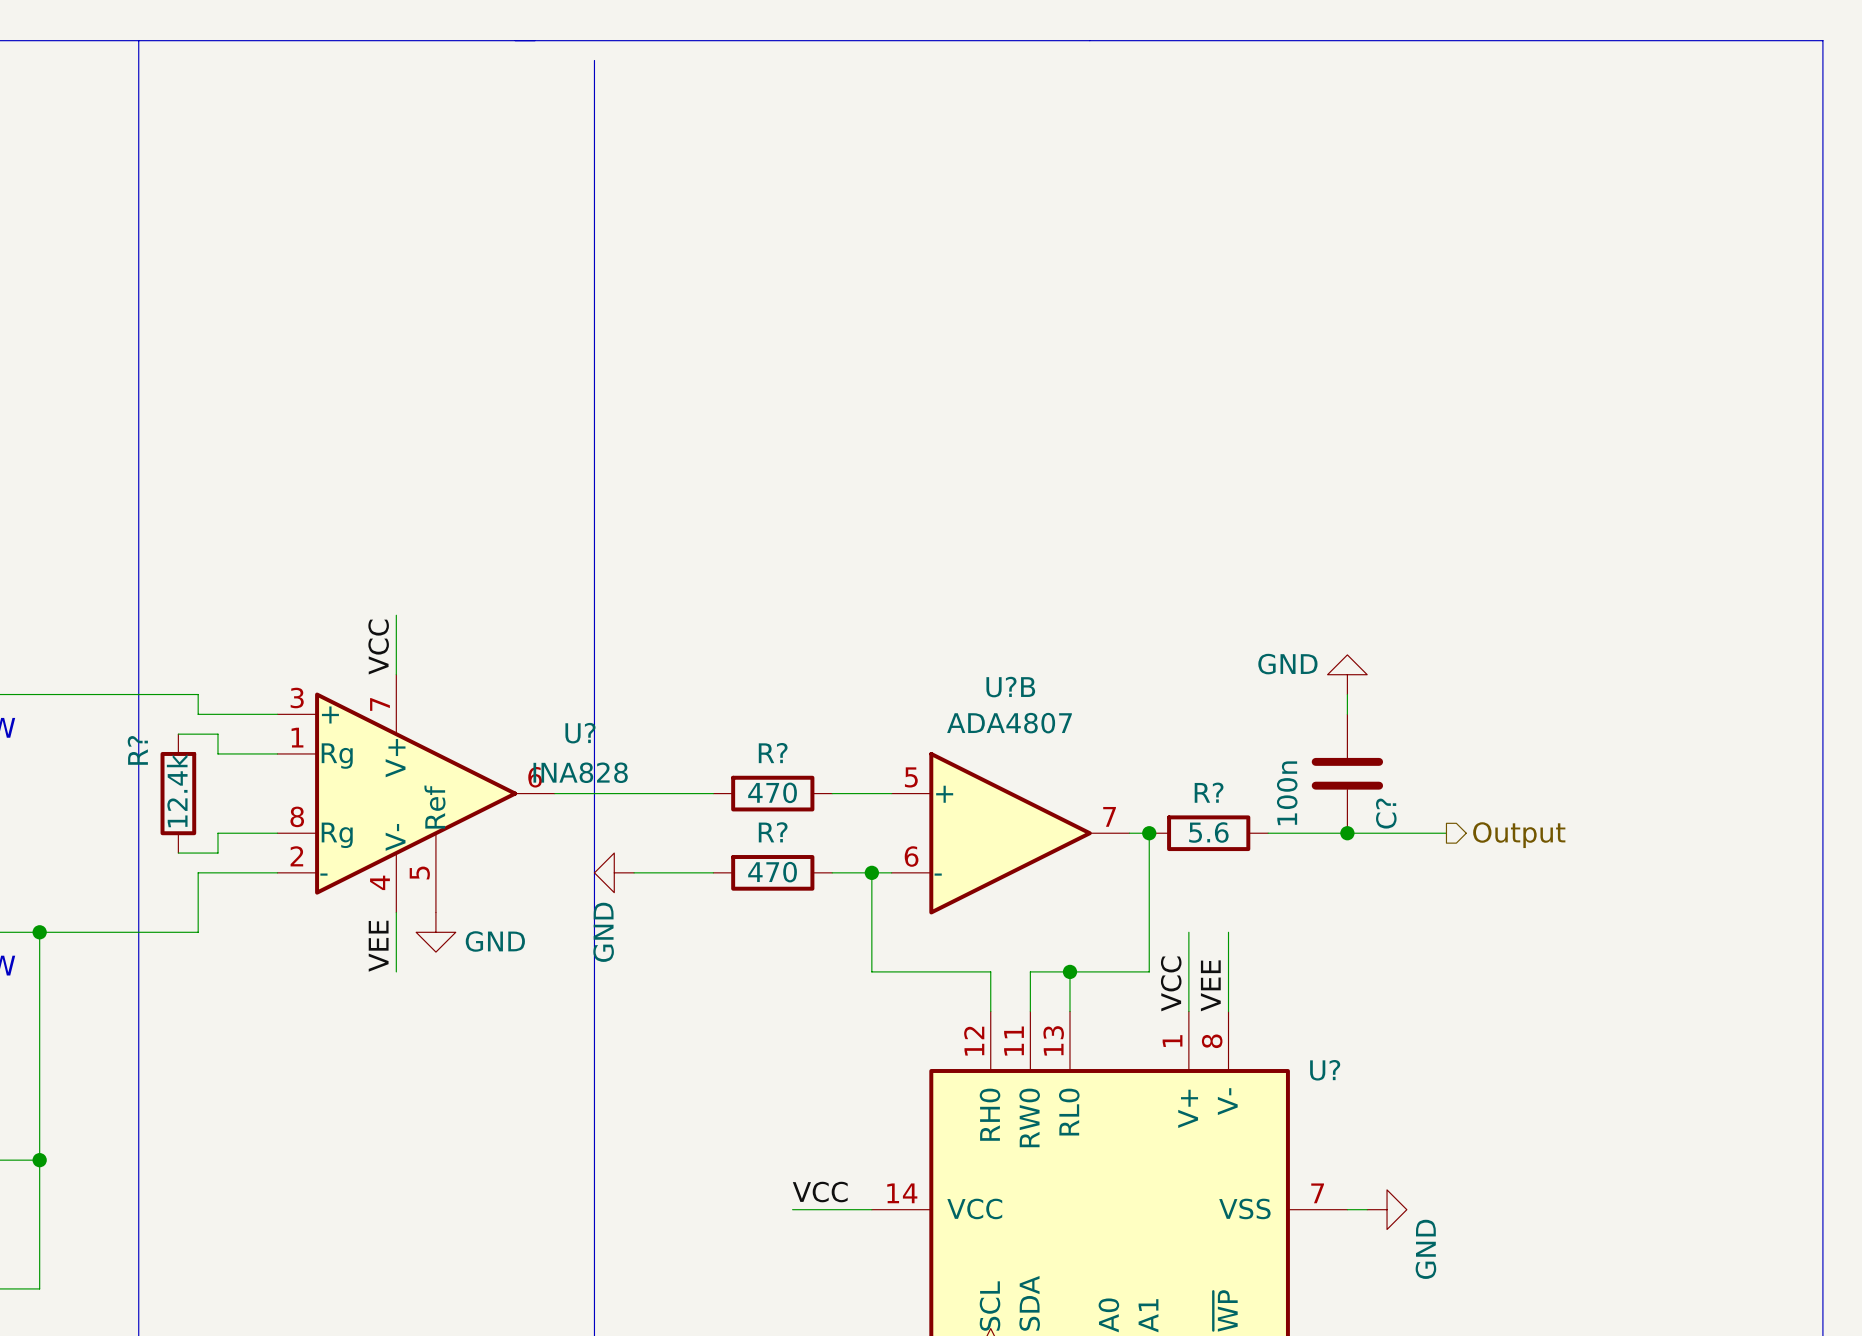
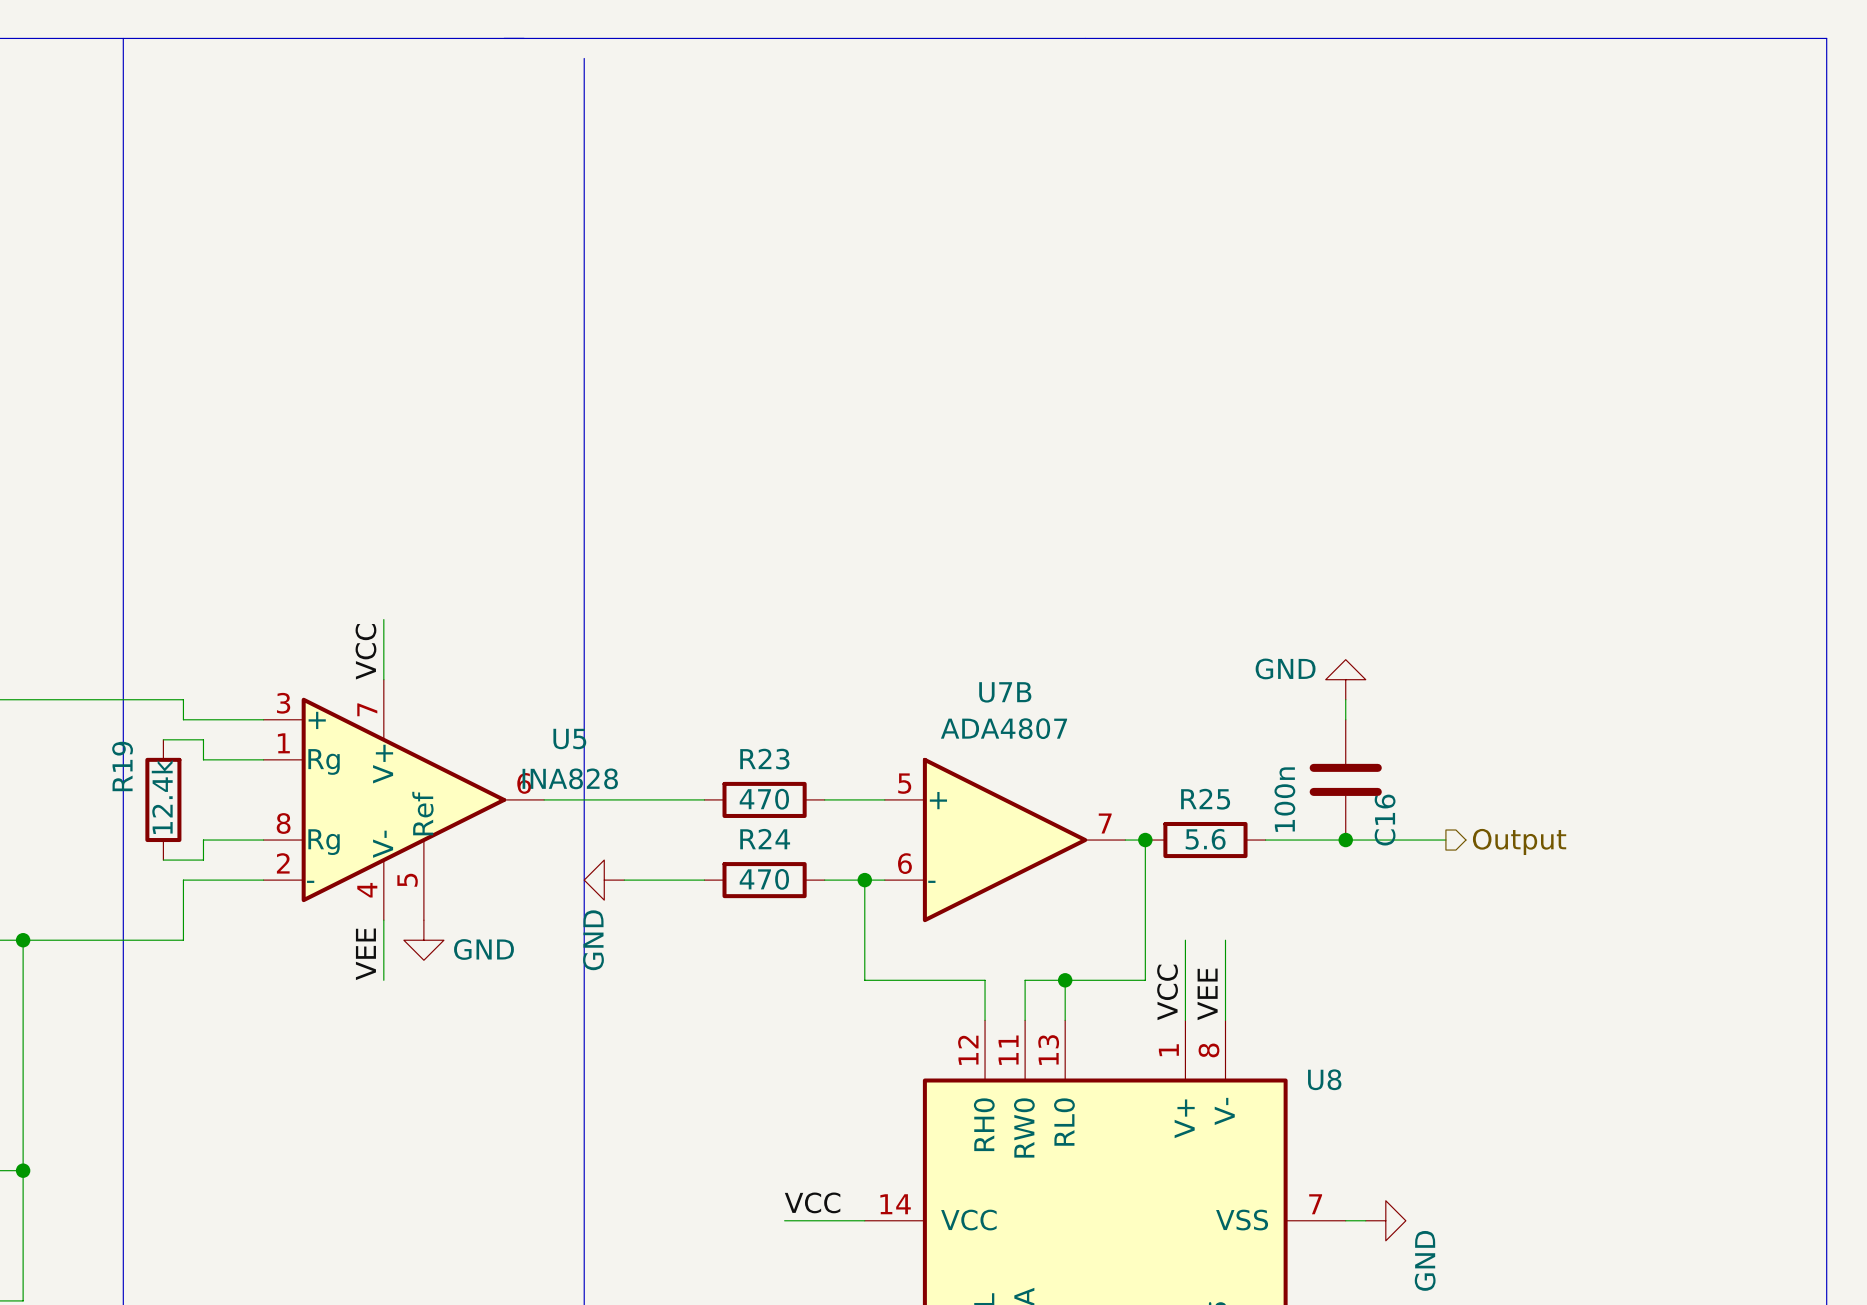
U?B name: U?B (1010, 687) -> U7B (1005, 692)
U? name: U? (580, 733) -> U5 (569, 739)
R? name: R? (137, 750) -> R19 (122, 766)
R? name: R? (773, 753) -> R23 (764, 759)
R? name: R? (1209, 792) -> R25 (1205, 799)
C? name: C? (1386, 813) -> C16 (1385, 820)
R? name: R? (773, 832) -> R24 (765, 839)
U? name: U? (1325, 1070) -> U8 (1324, 1079)

